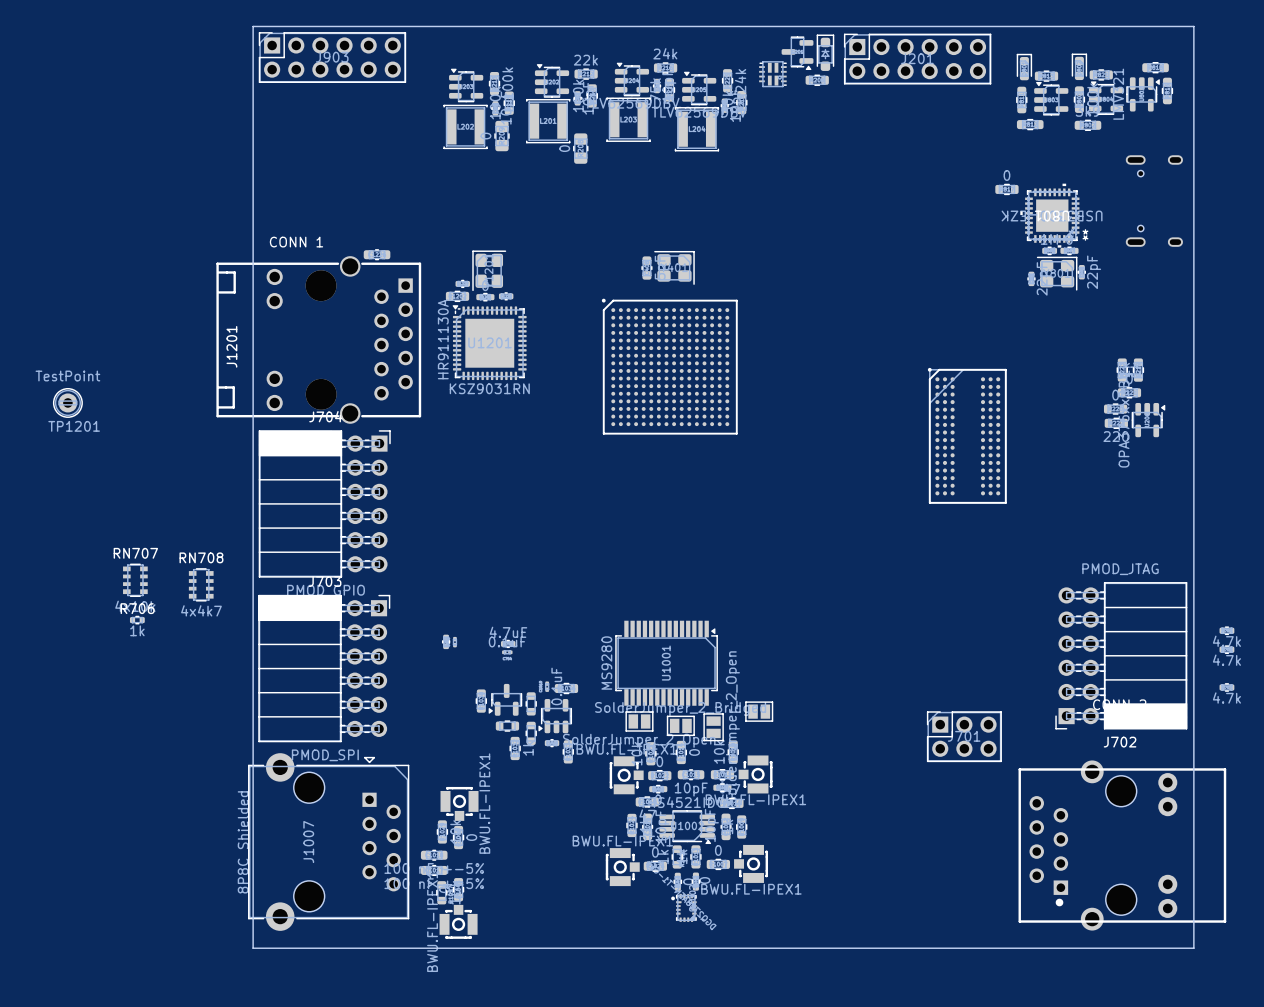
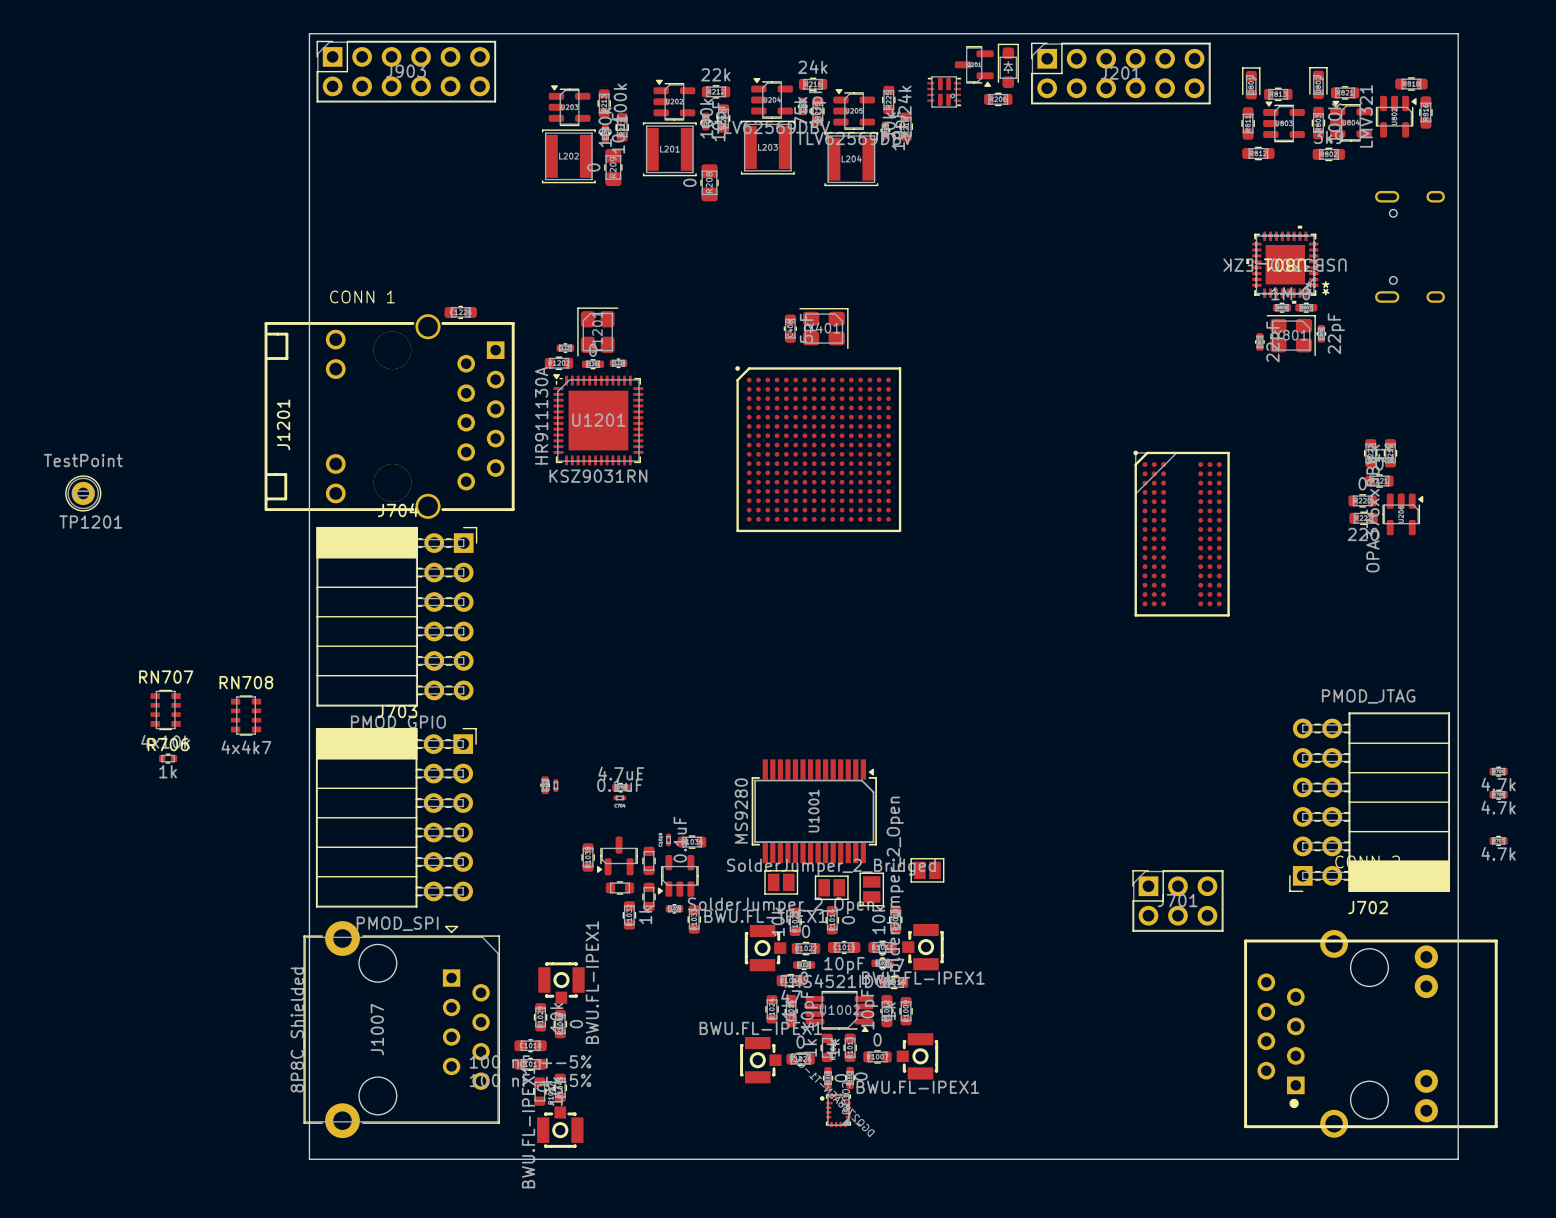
part: 0 (1006, 189) -> none

